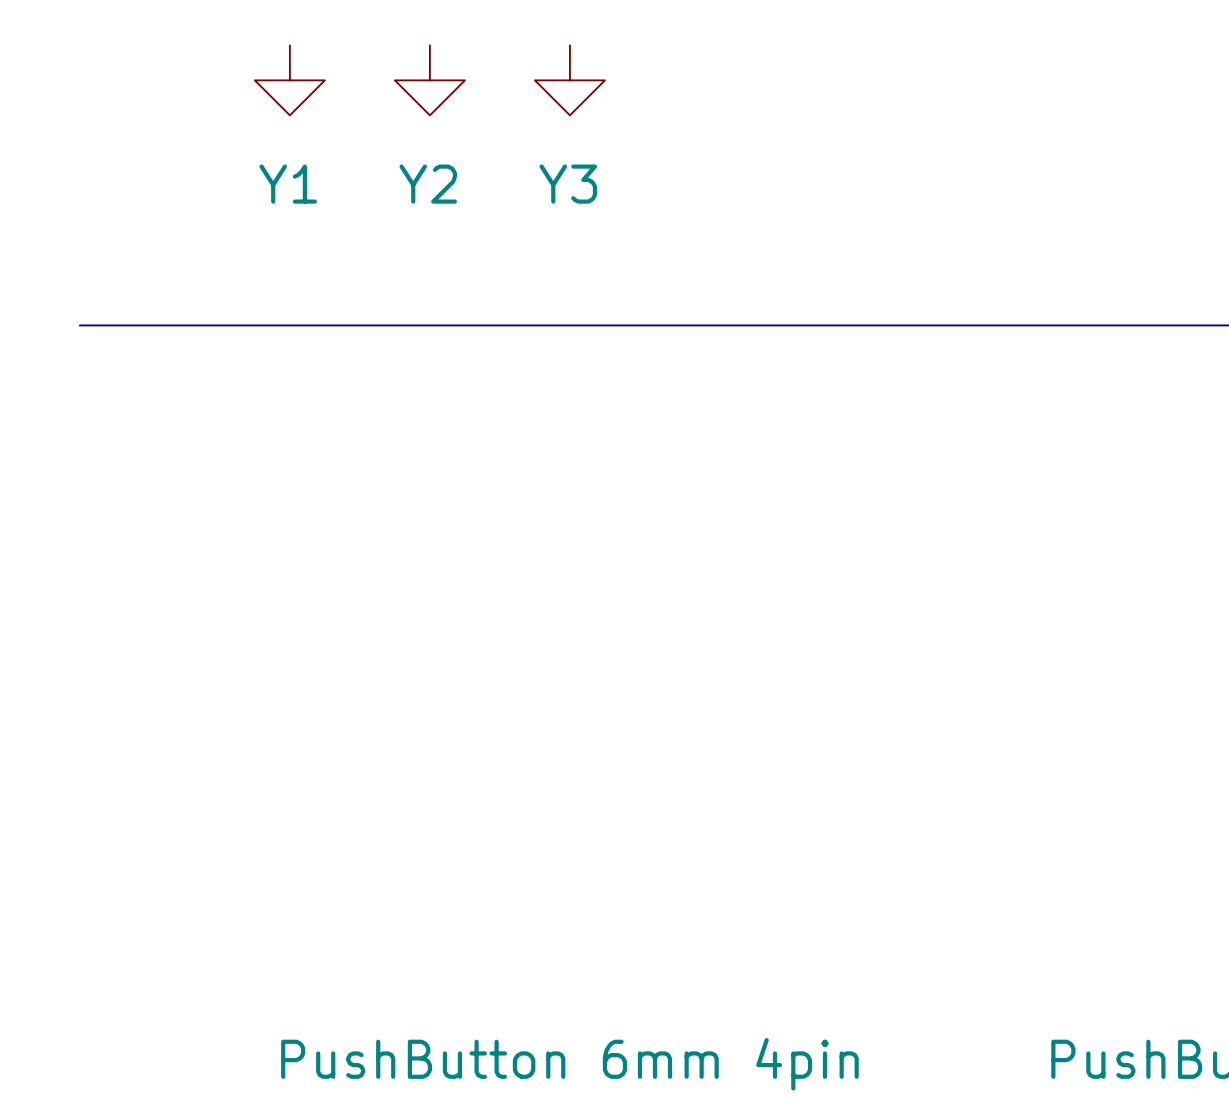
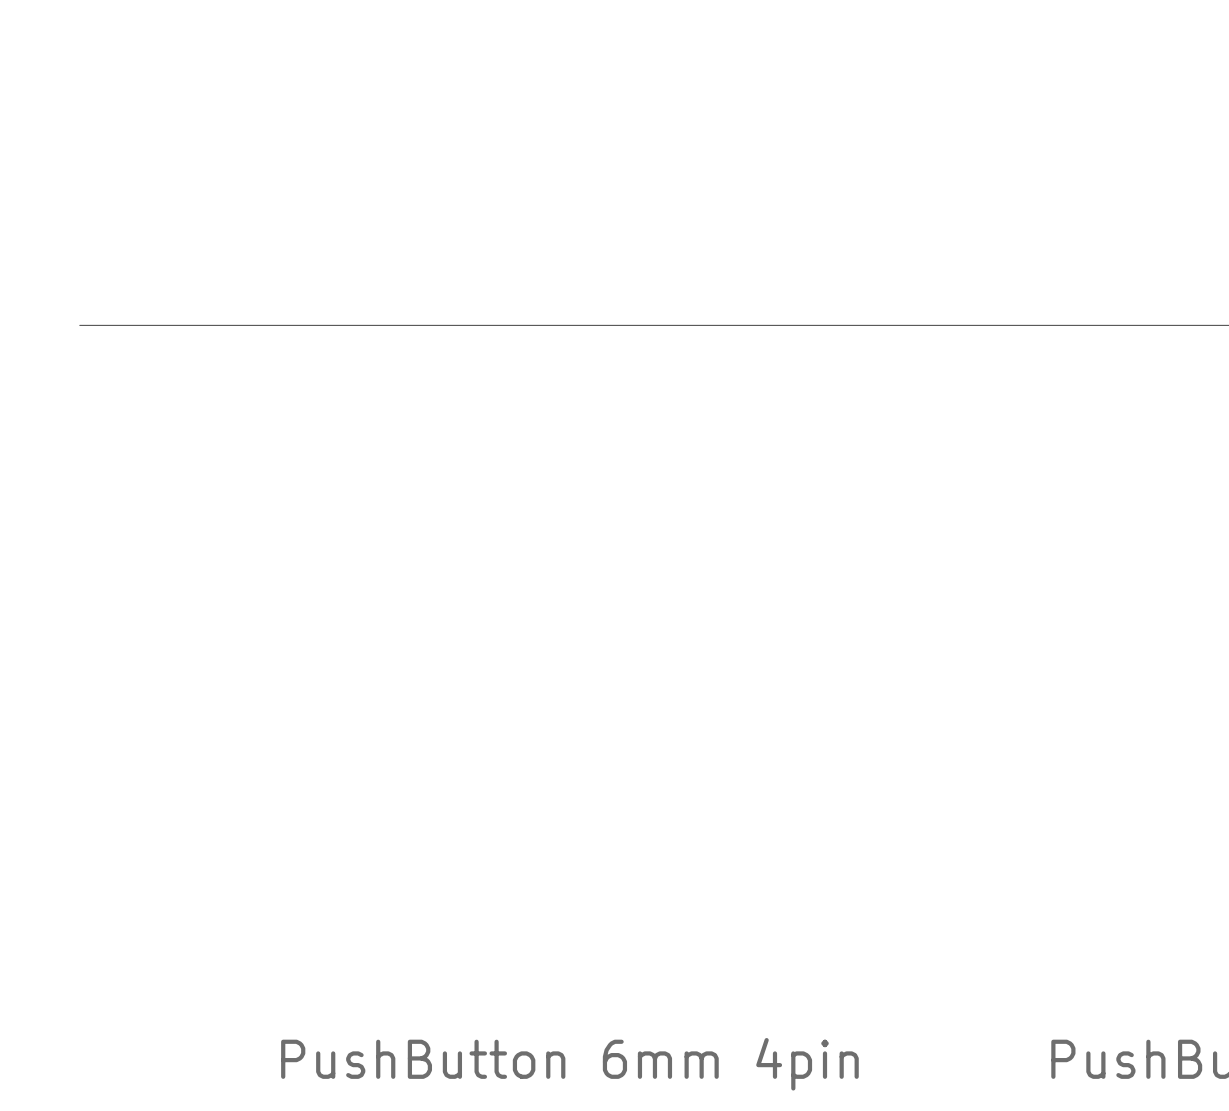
power symbol: Y1 (289, 80) -> none
power symbol: Y2 (429, 80) -> none
power symbol: Y3 (569, 80) -> none

